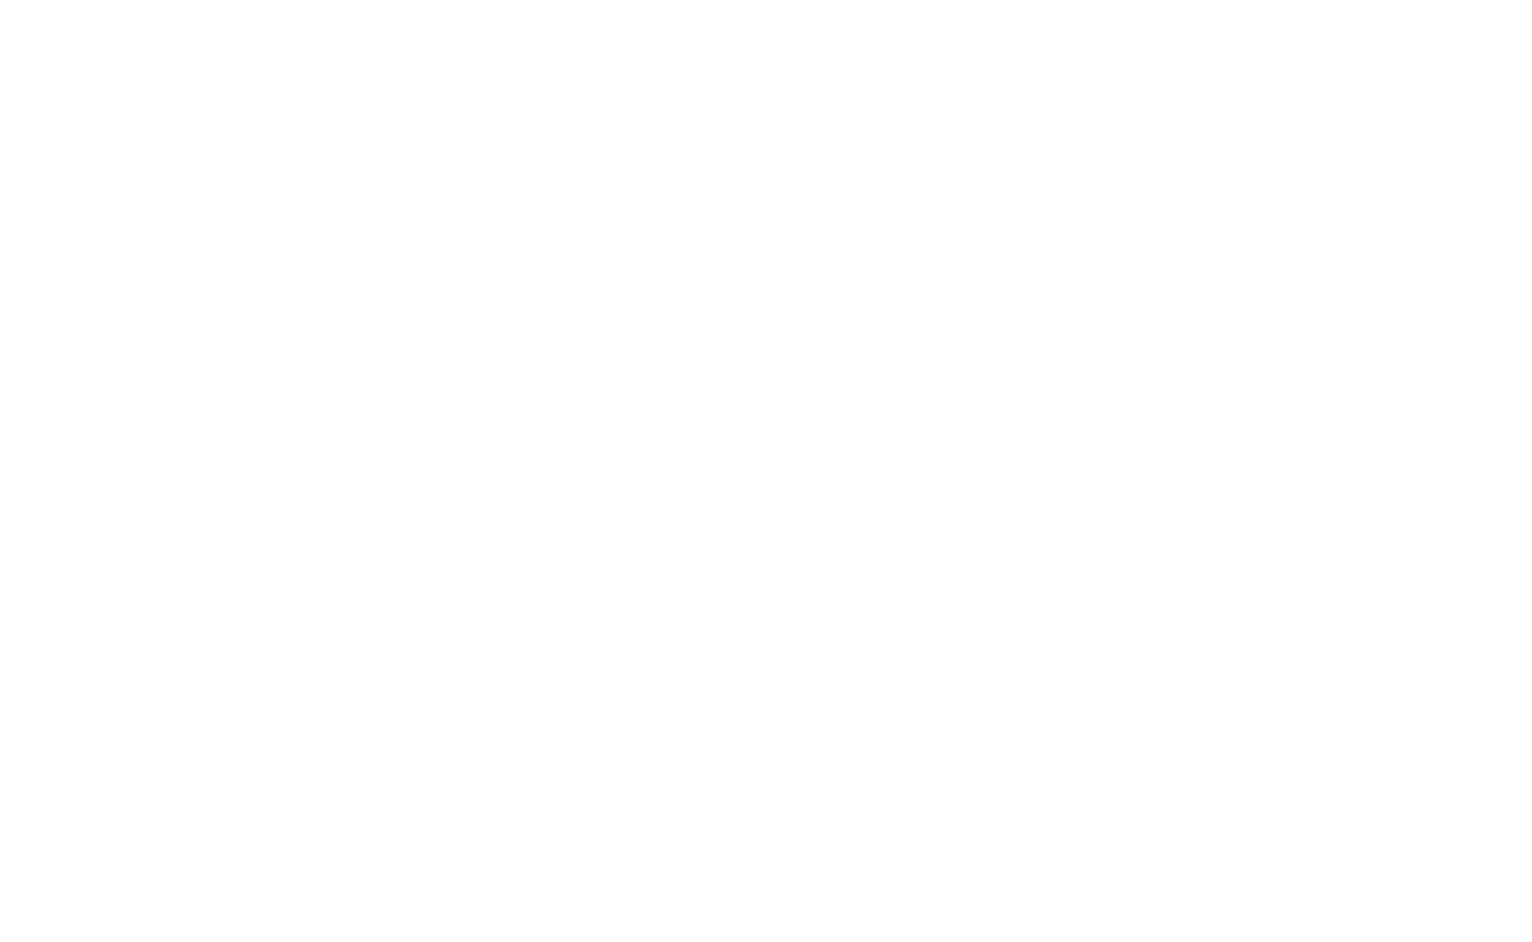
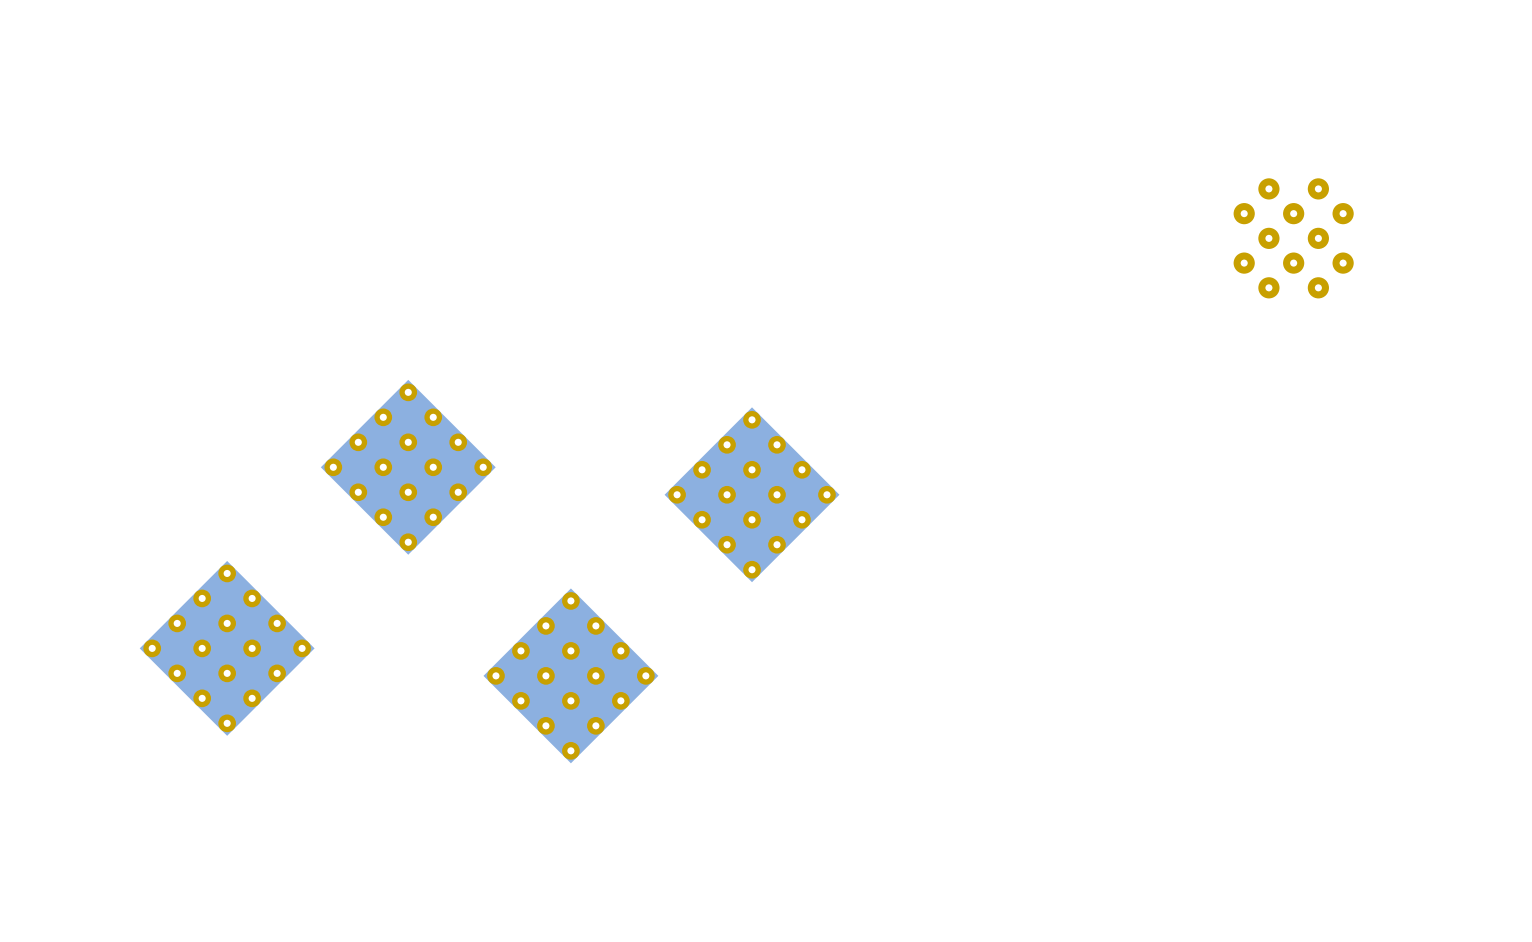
part: none -> (1293, 238)
part: none -> (408, 467)
part: none -> (752, 494)
part: none -> (227, 648)
part: none -> (570, 675)

